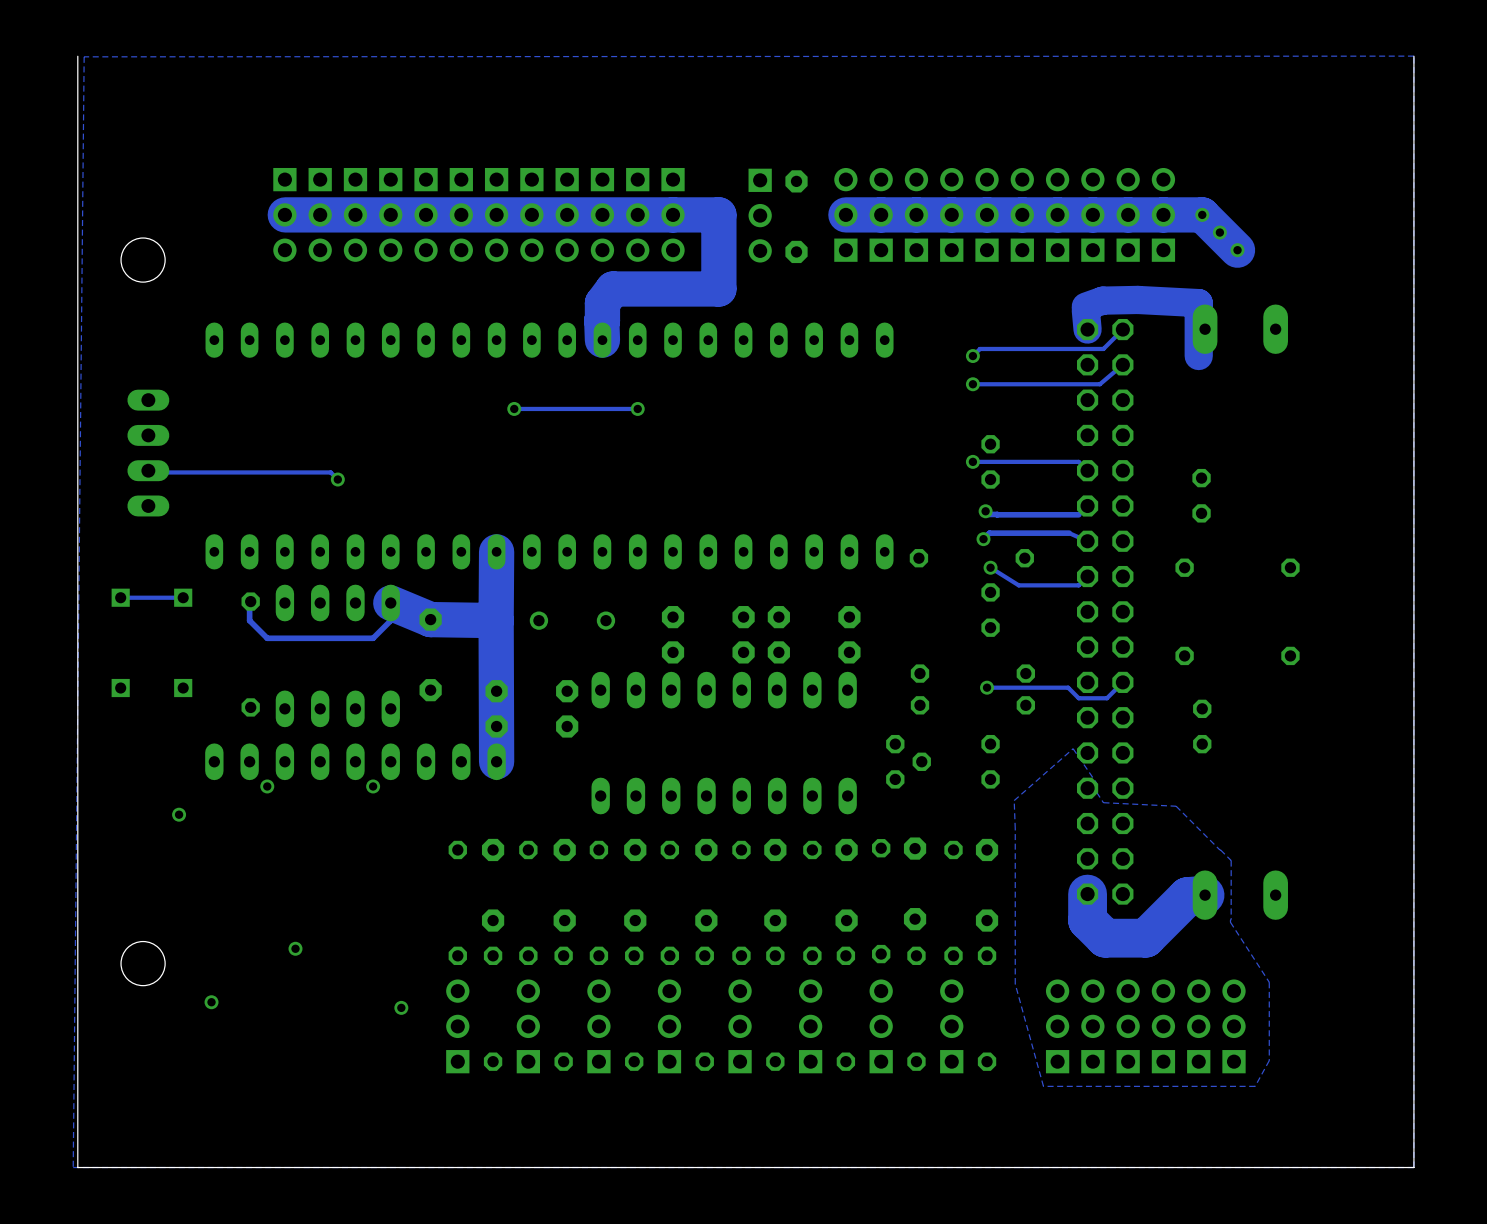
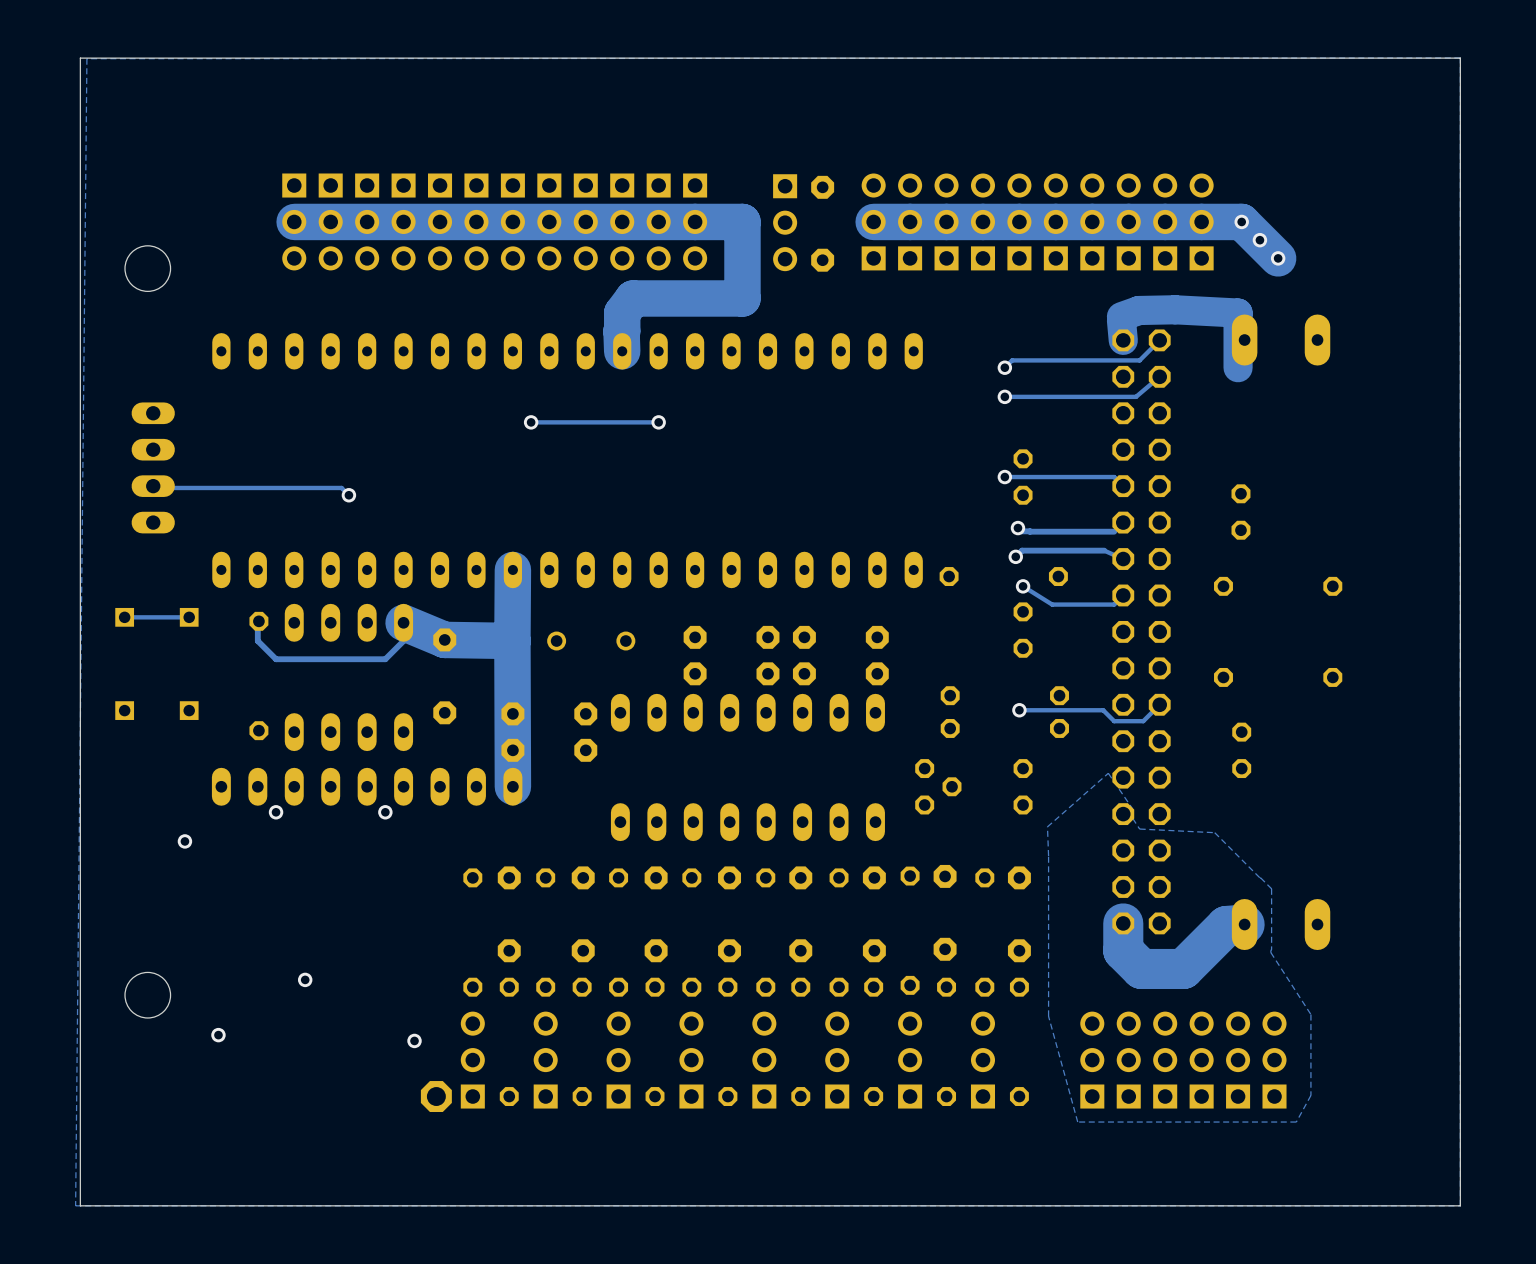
board edge: none -> (1460, 58) (80, 58)
part: none -> (436, 1096)

